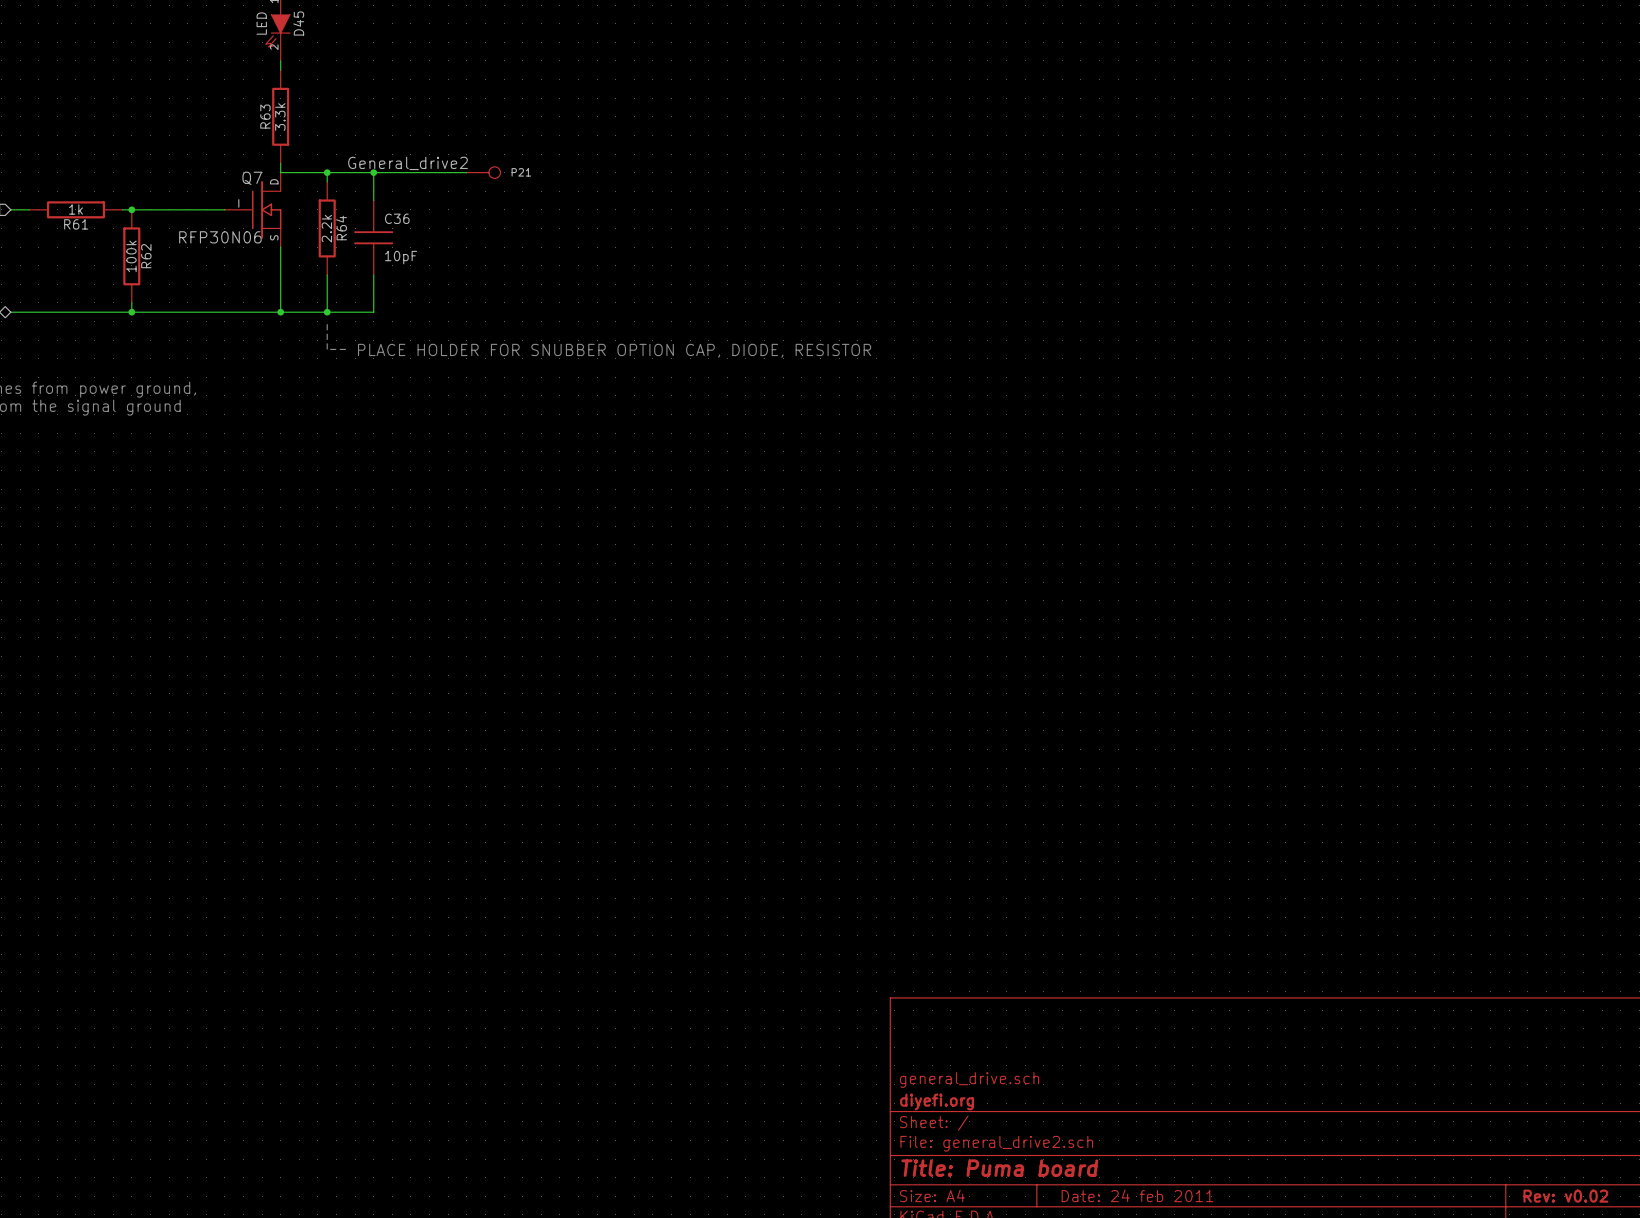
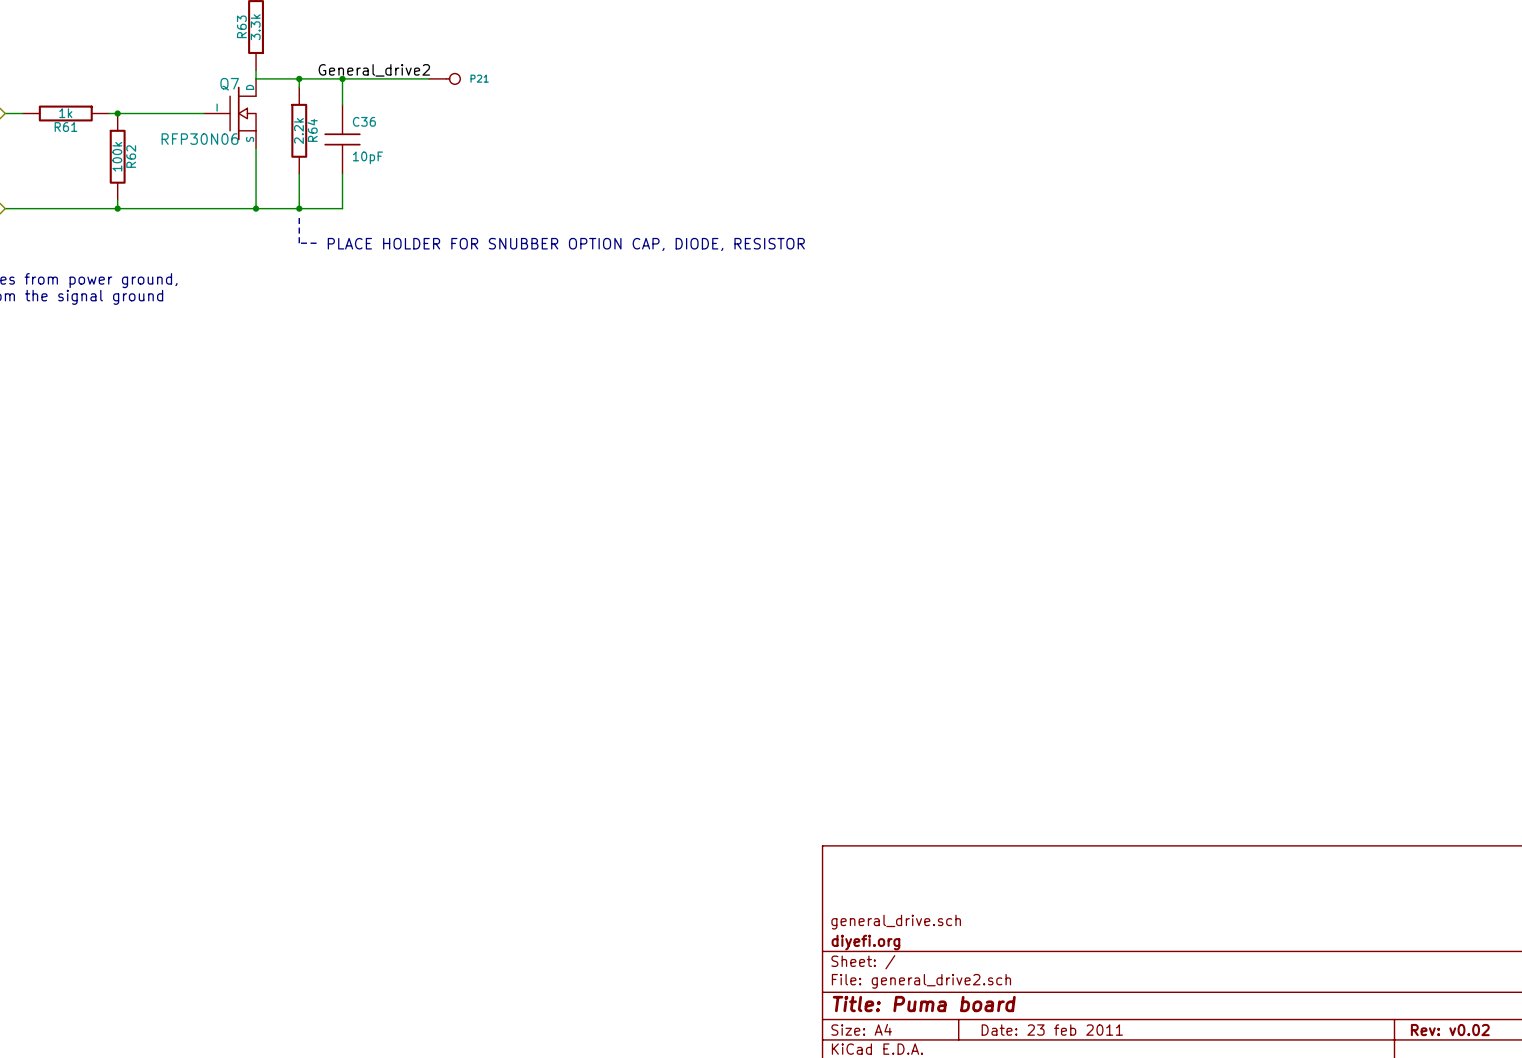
title block: Date: 24 feb 2011 (1137, 1195) -> Date: 23 feb 2011 (1052, 1030)

